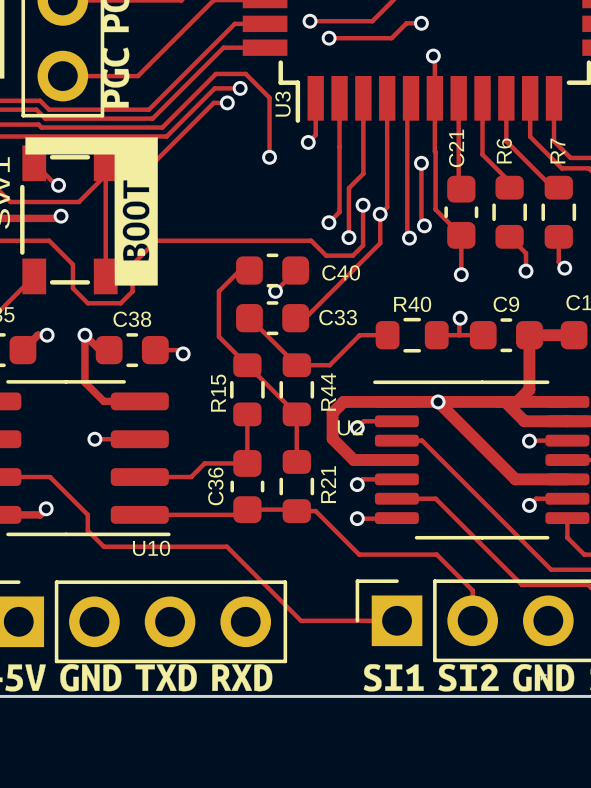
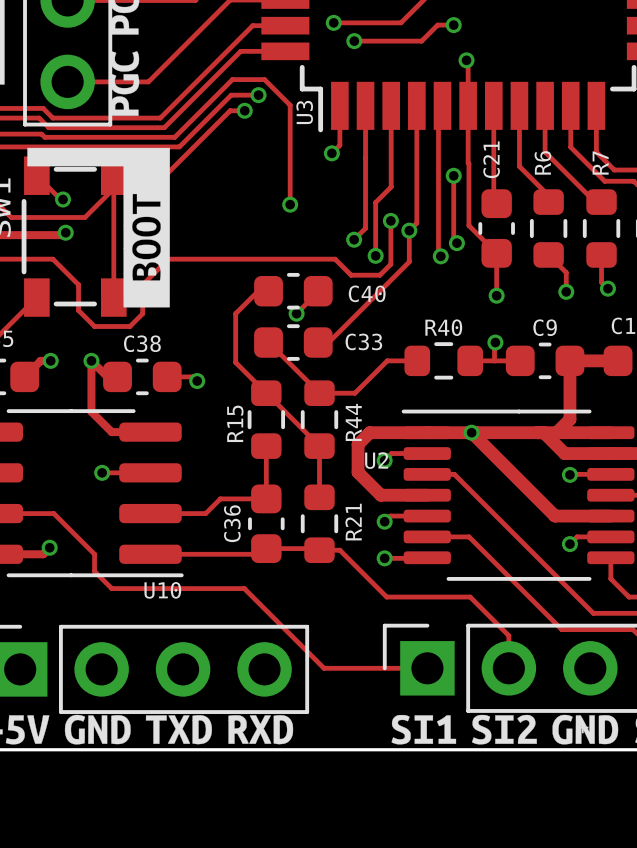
track: none -> (290, 169) (290, 204)
via position: (269, 157) -> (290, 204)

